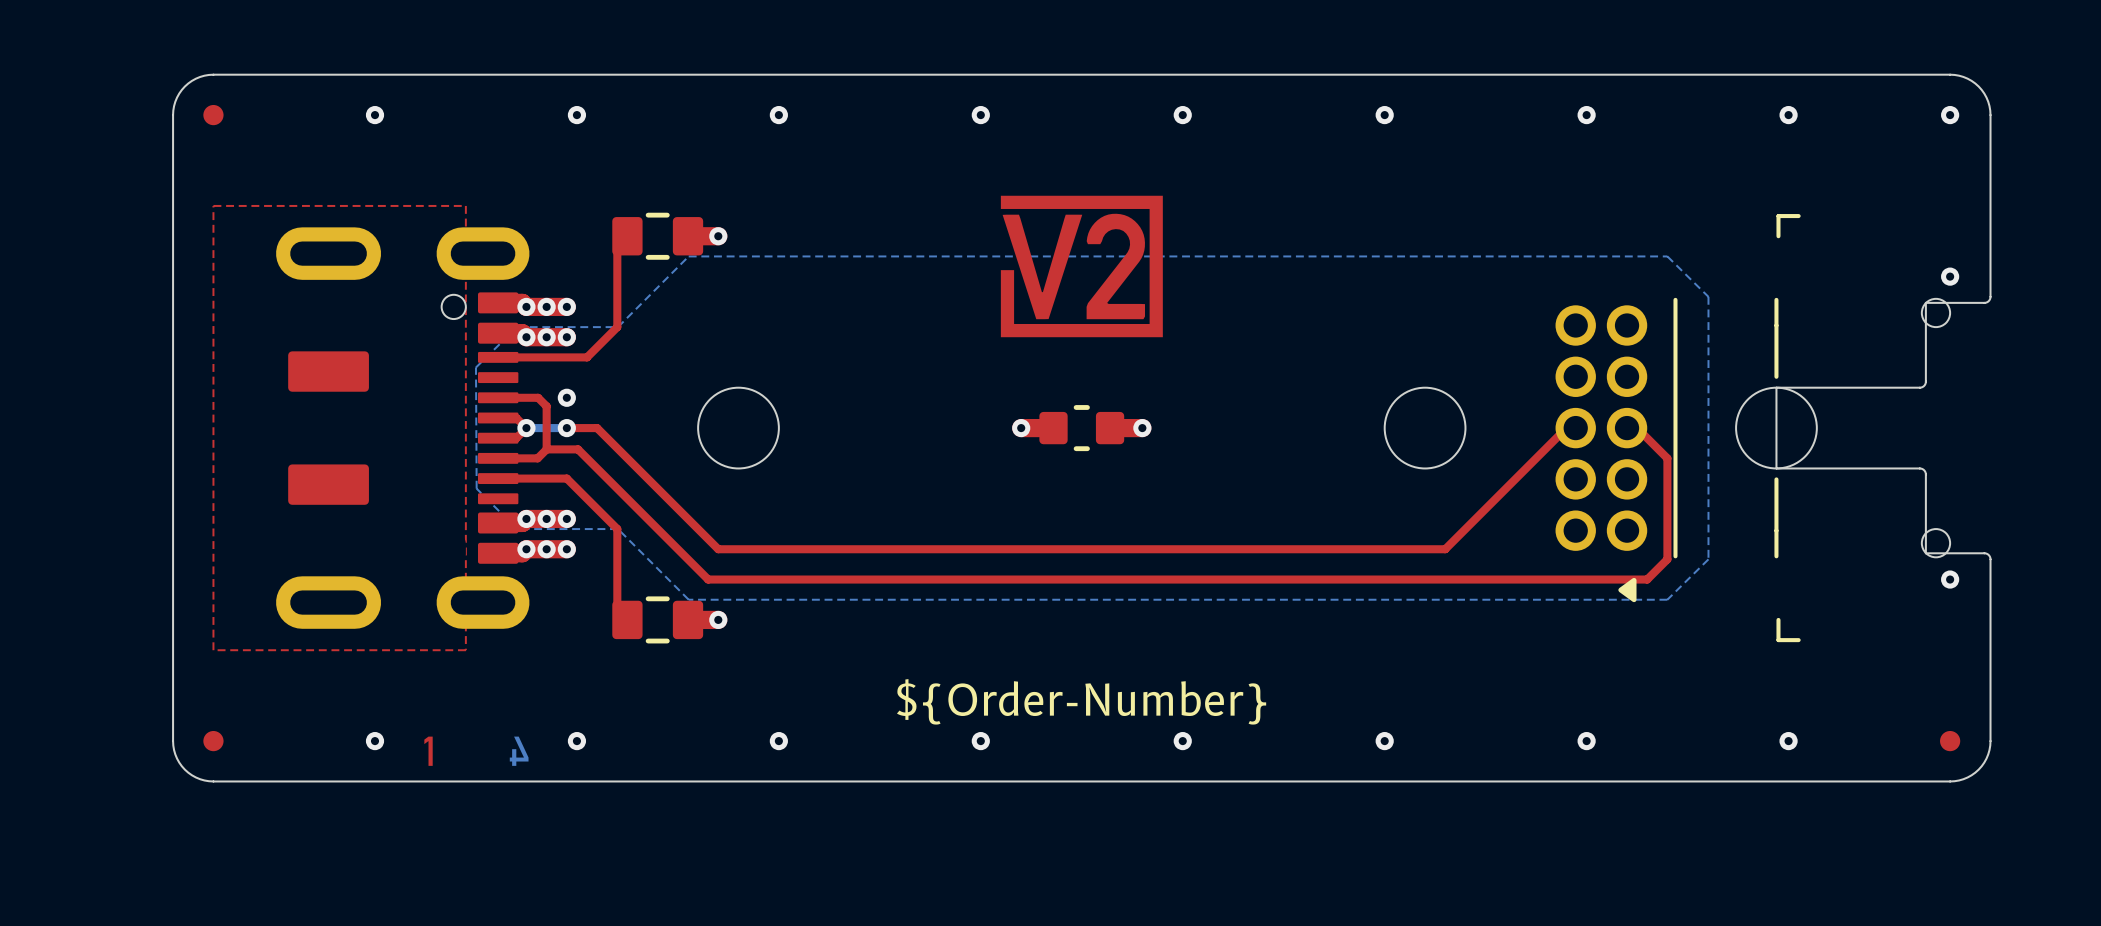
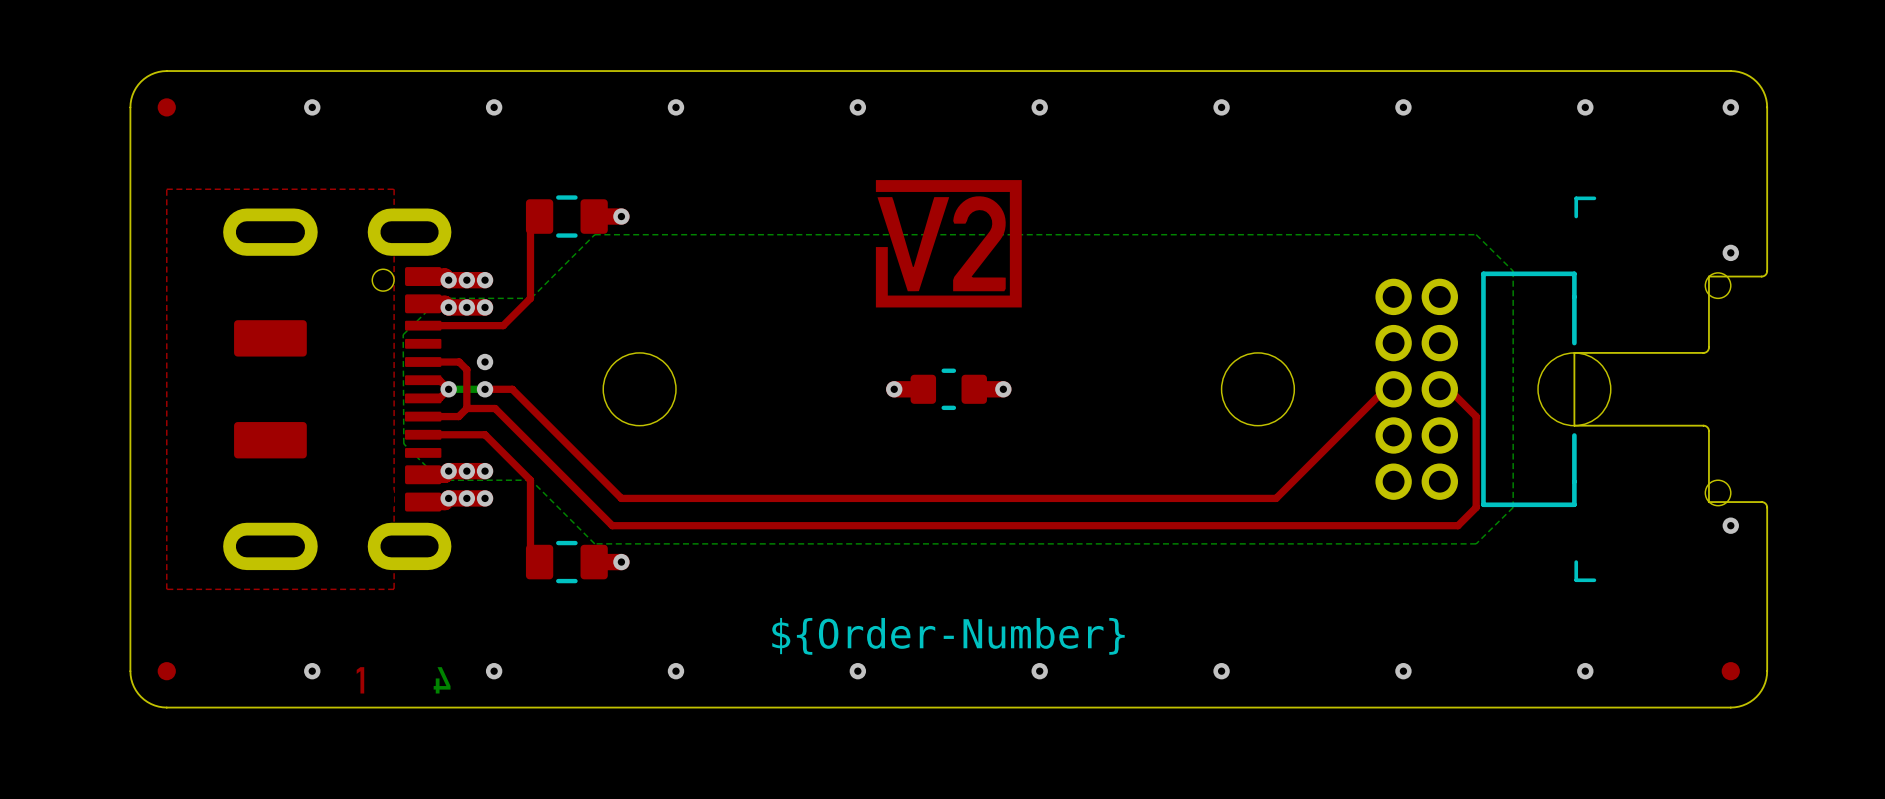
part footprint: [1555, 297, 1779, 603] -> [1375, 271, 1577, 508]

